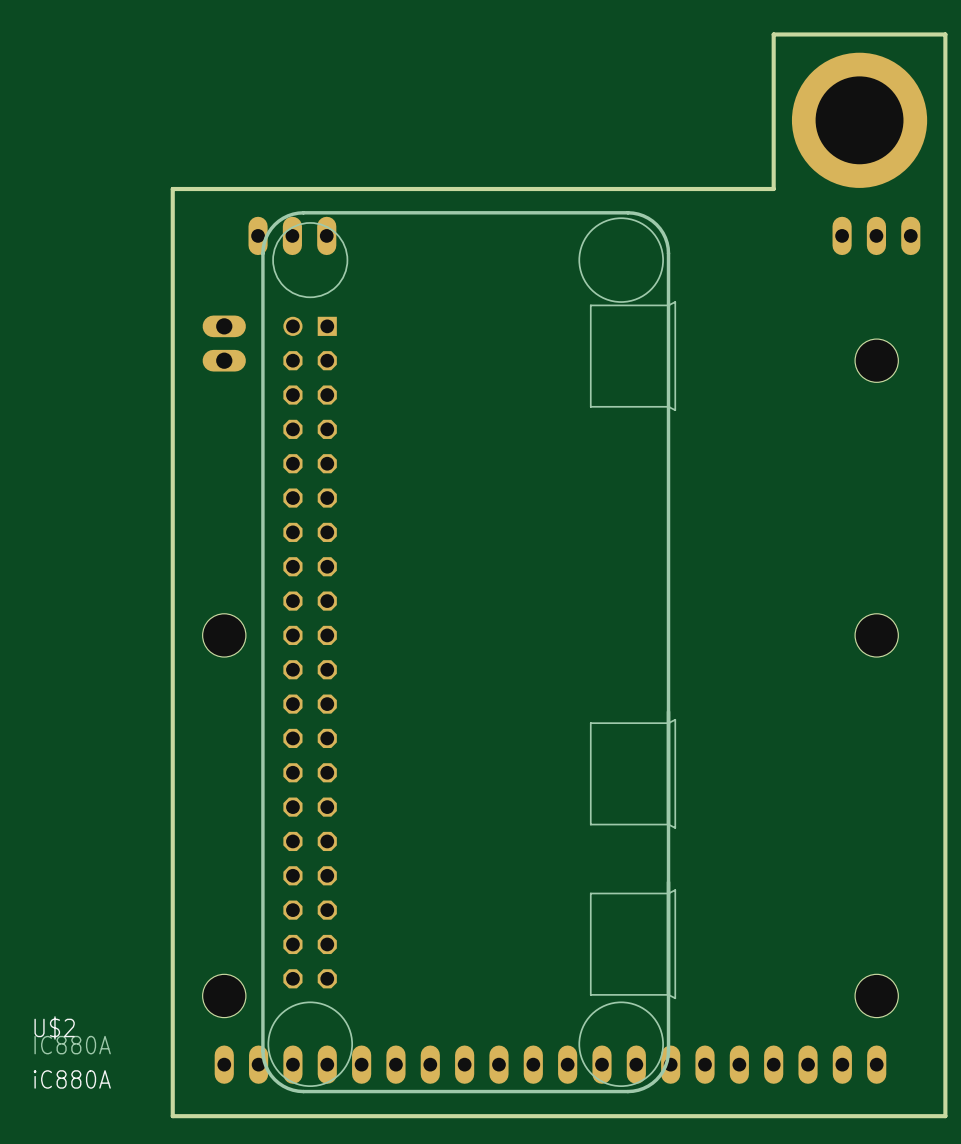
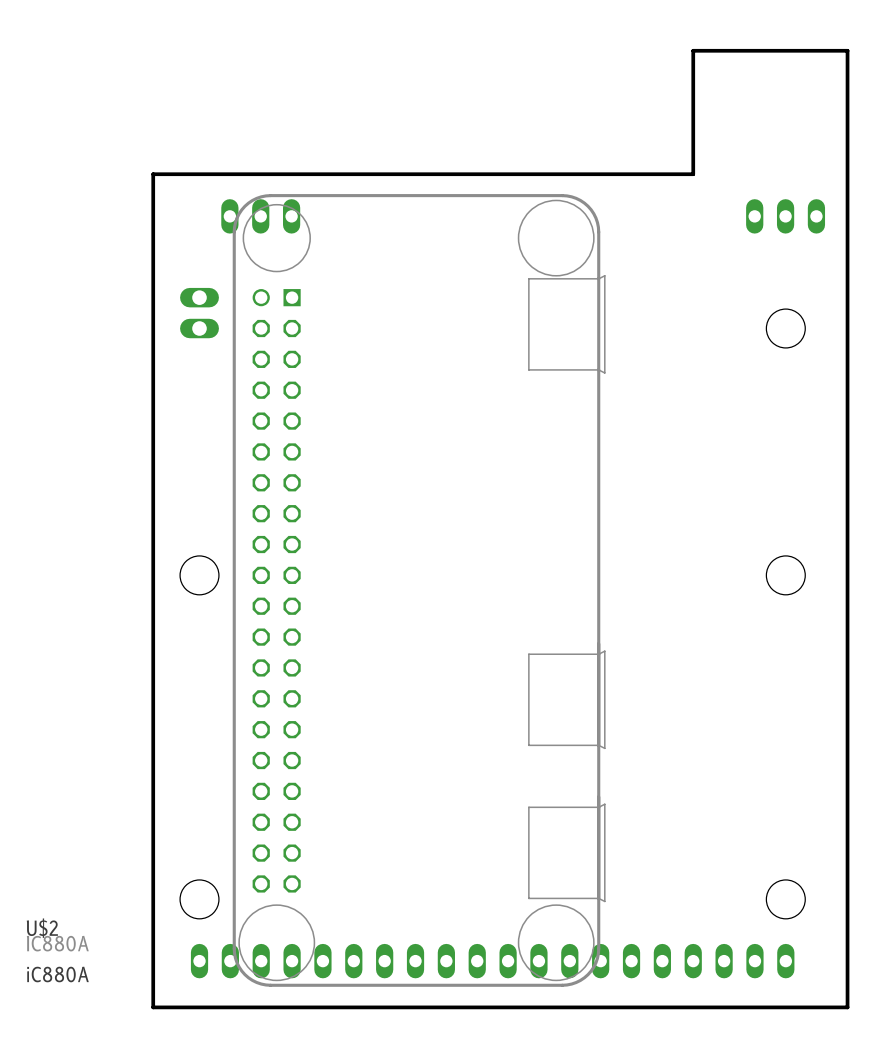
board edge: (773, 34) (773, 51) (773, 34) -> none
board edge: (773, 34) (945, 34) -> none
board edge: (945, 34) (945, 51) (945, 34) -> none
board edge: none -> (693, 50) (847, 50) (693, 50)
part: (859, 120) -> none

